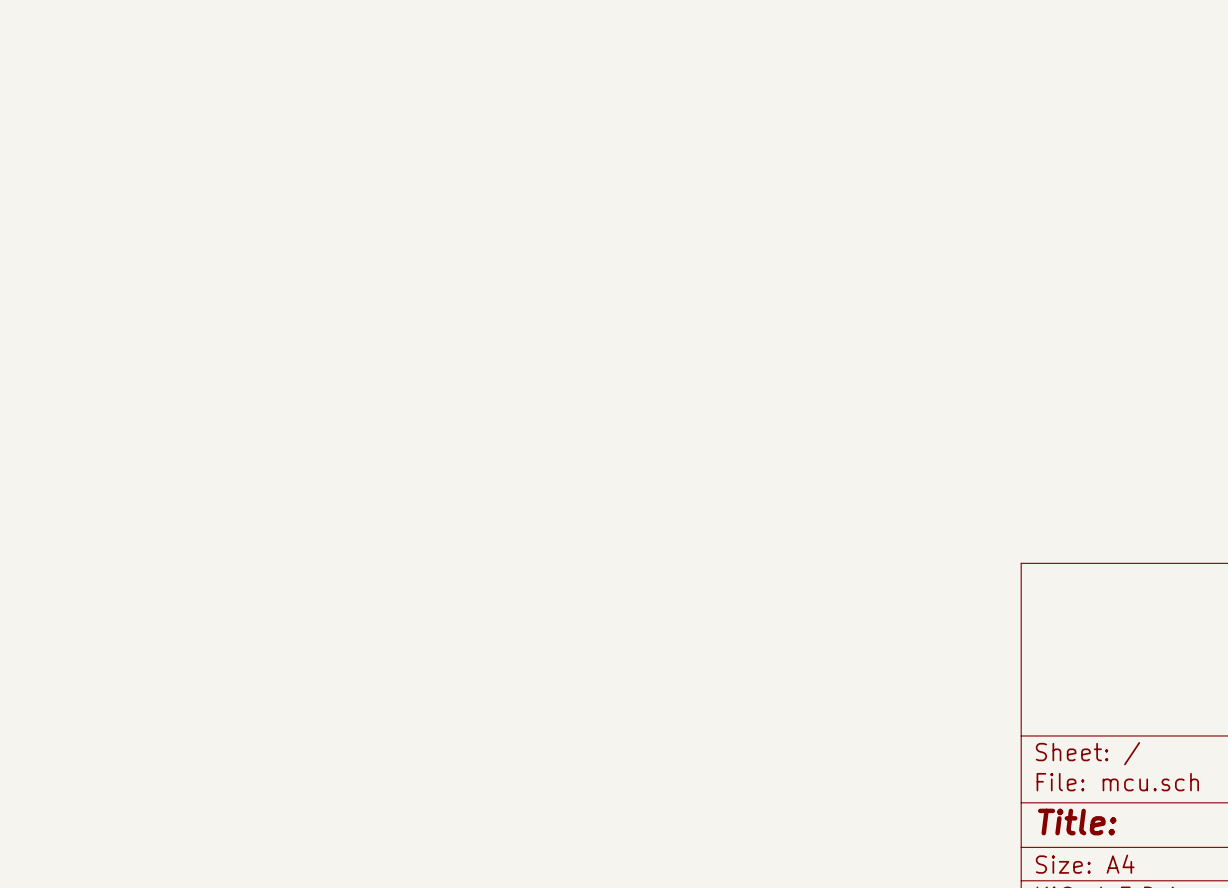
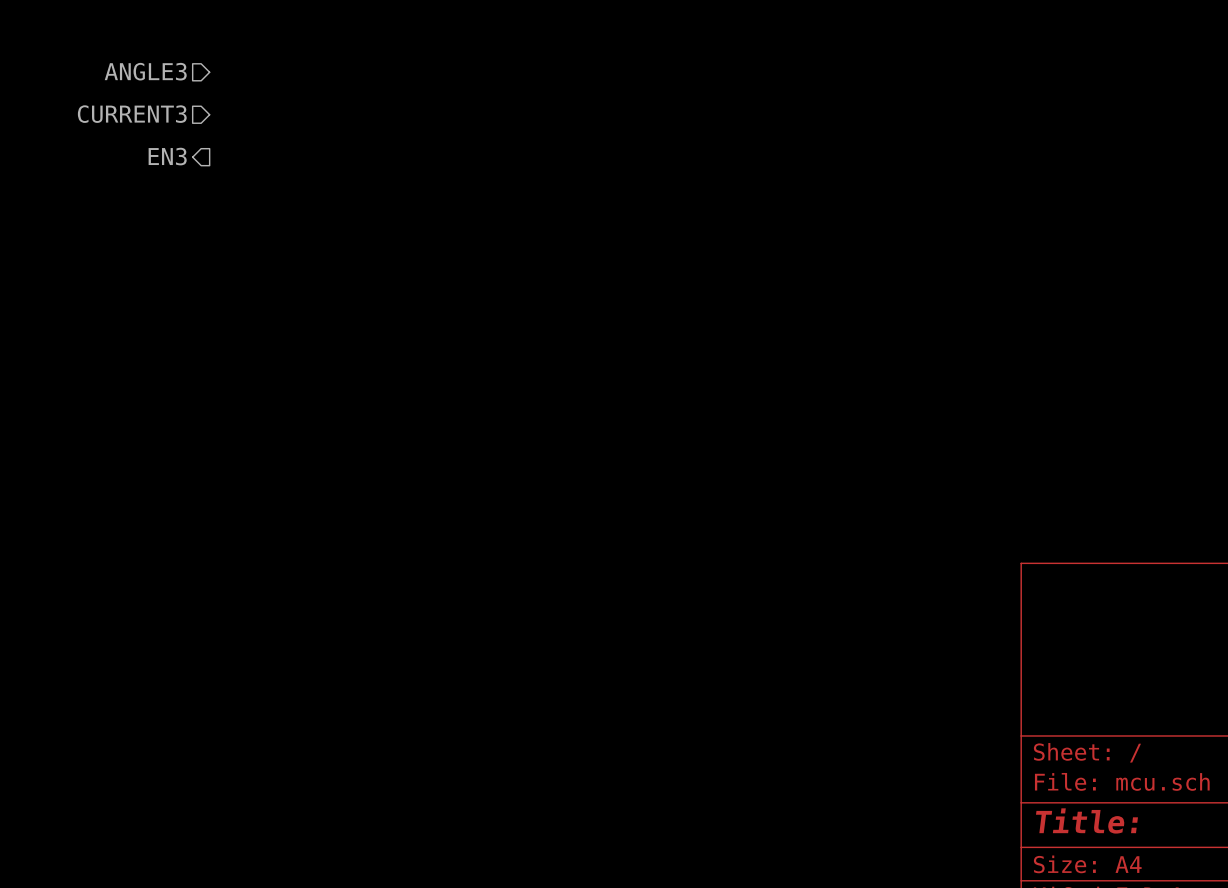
hierarchical label: none -> ANGLE3 (145, 71)
hierarchical label: none -> CURRENT3 (132, 114)
hierarchical label: none -> EN3 (167, 156)

